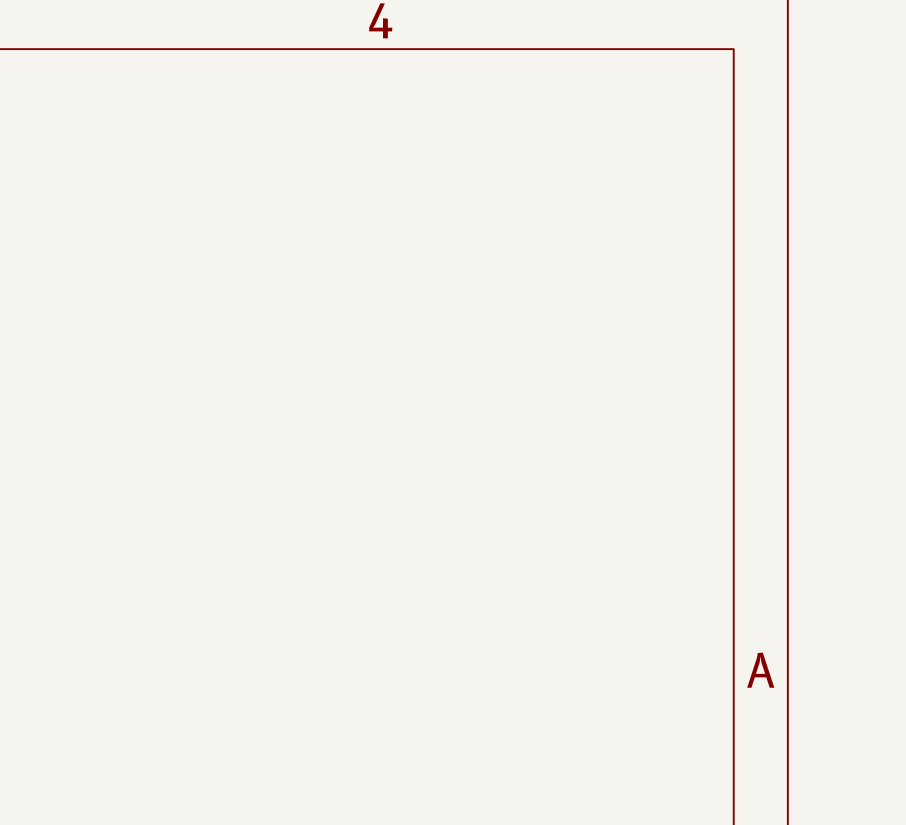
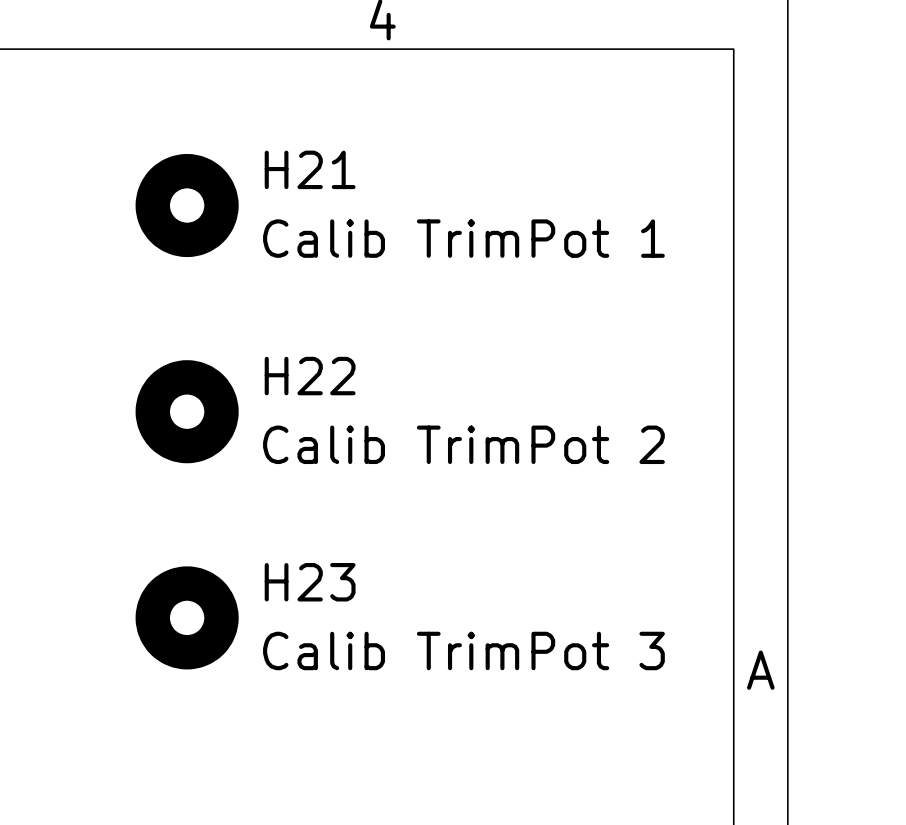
H21: none -> Calib TrimPot 1 (187, 205)
H22: none -> Calib TrimPot 2 (187, 411)
H23: none -> Calib TrimPot 3 (187, 617)

